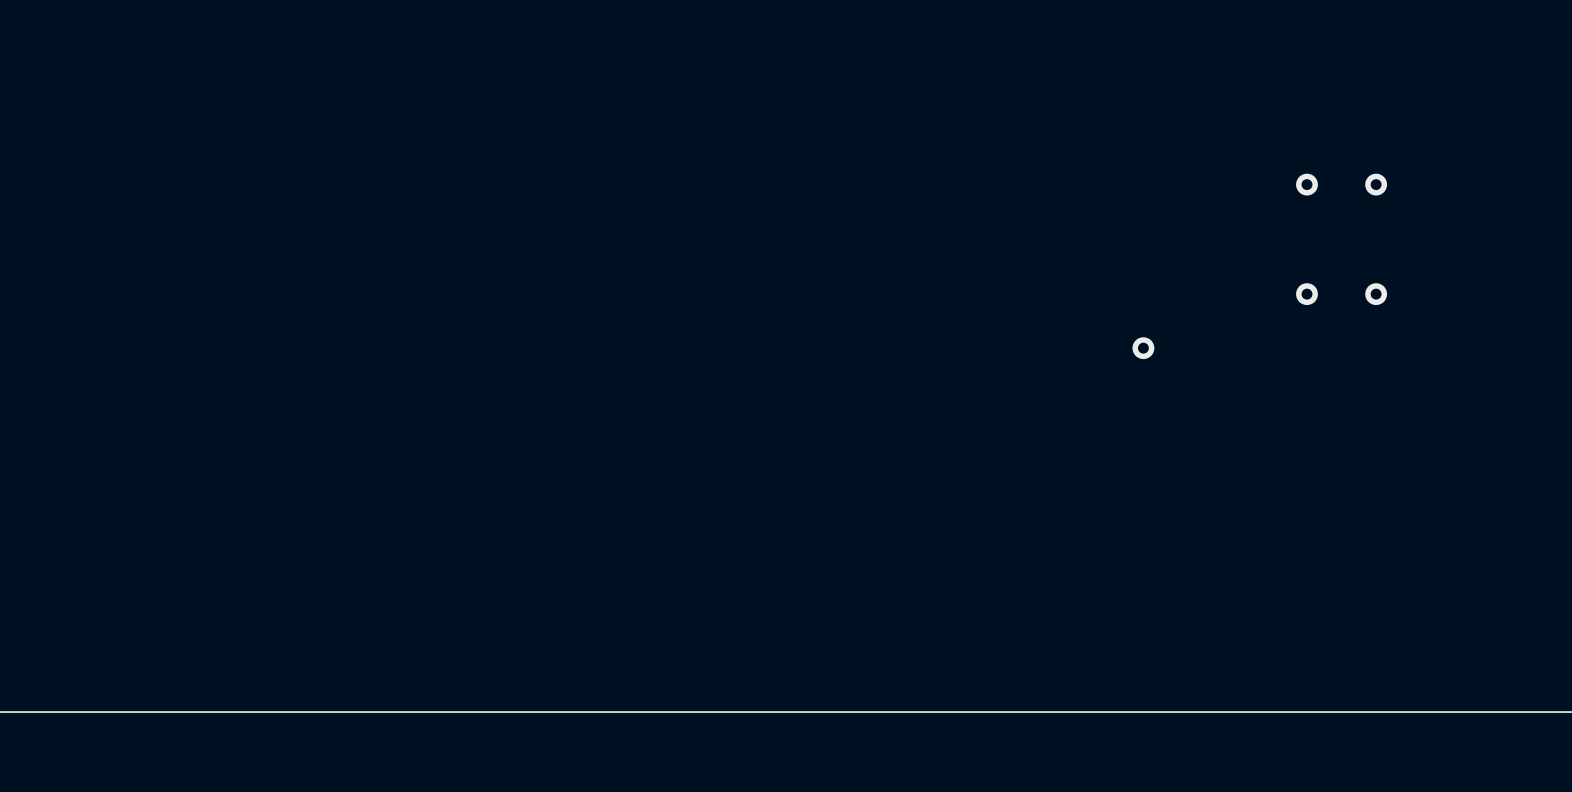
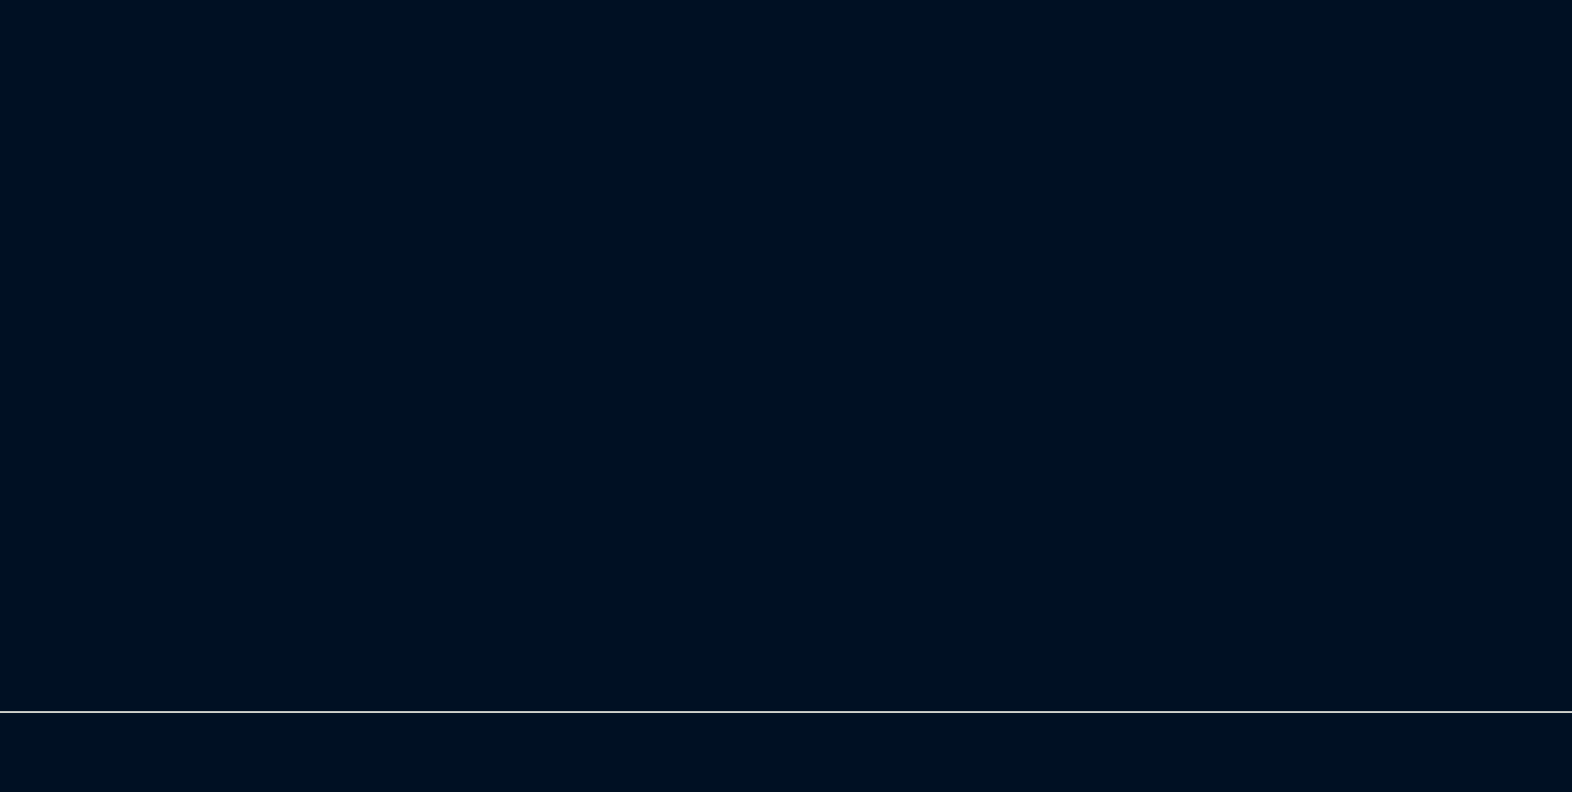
via: (1306, 184) -> none
via: (1376, 184) -> none
via: (1306, 294) -> none
via: (1376, 294) -> none
via: (1143, 348) -> none

